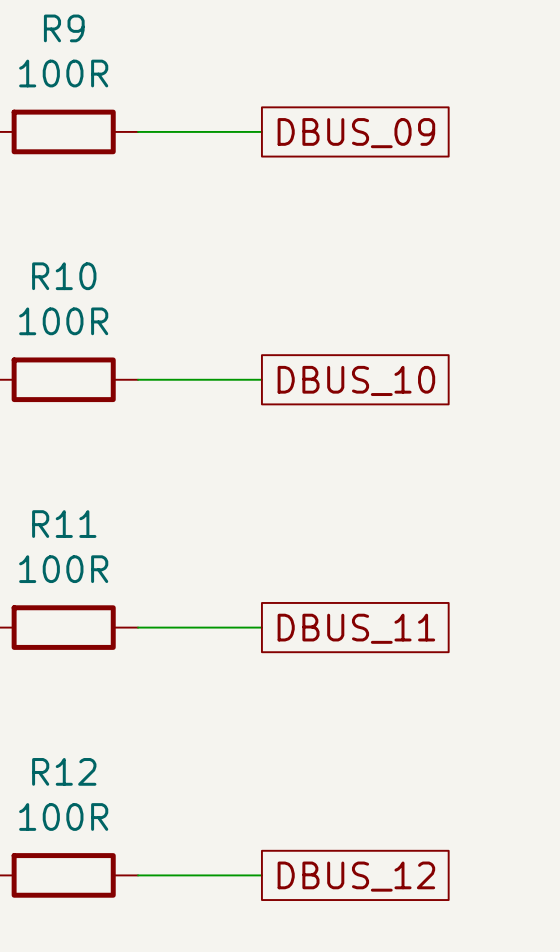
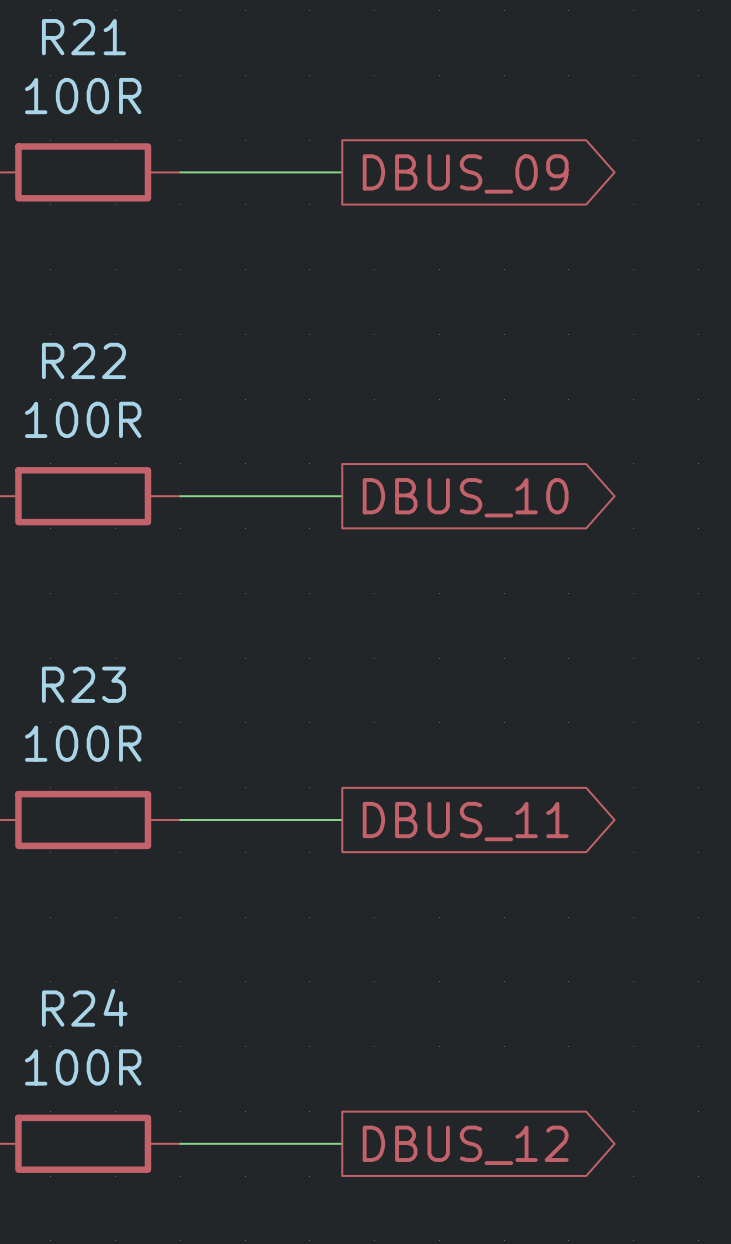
R9 name: R9 (64, 28) -> R21 (83, 37)
global label shape: passive (356, 133) -> output (465, 173)
R10 name: R10 (64, 276) -> R22 (83, 360)
global label shape: passive (356, 380) -> output (465, 497)
R11 name: R11 (64, 524) -> R23 (83, 684)
global label shape: passive (356, 628) -> output (465, 821)
R12 name: R12 (64, 771) -> R24 (84, 1007)
global label shape: passive (356, 876) -> output (465, 1145)

